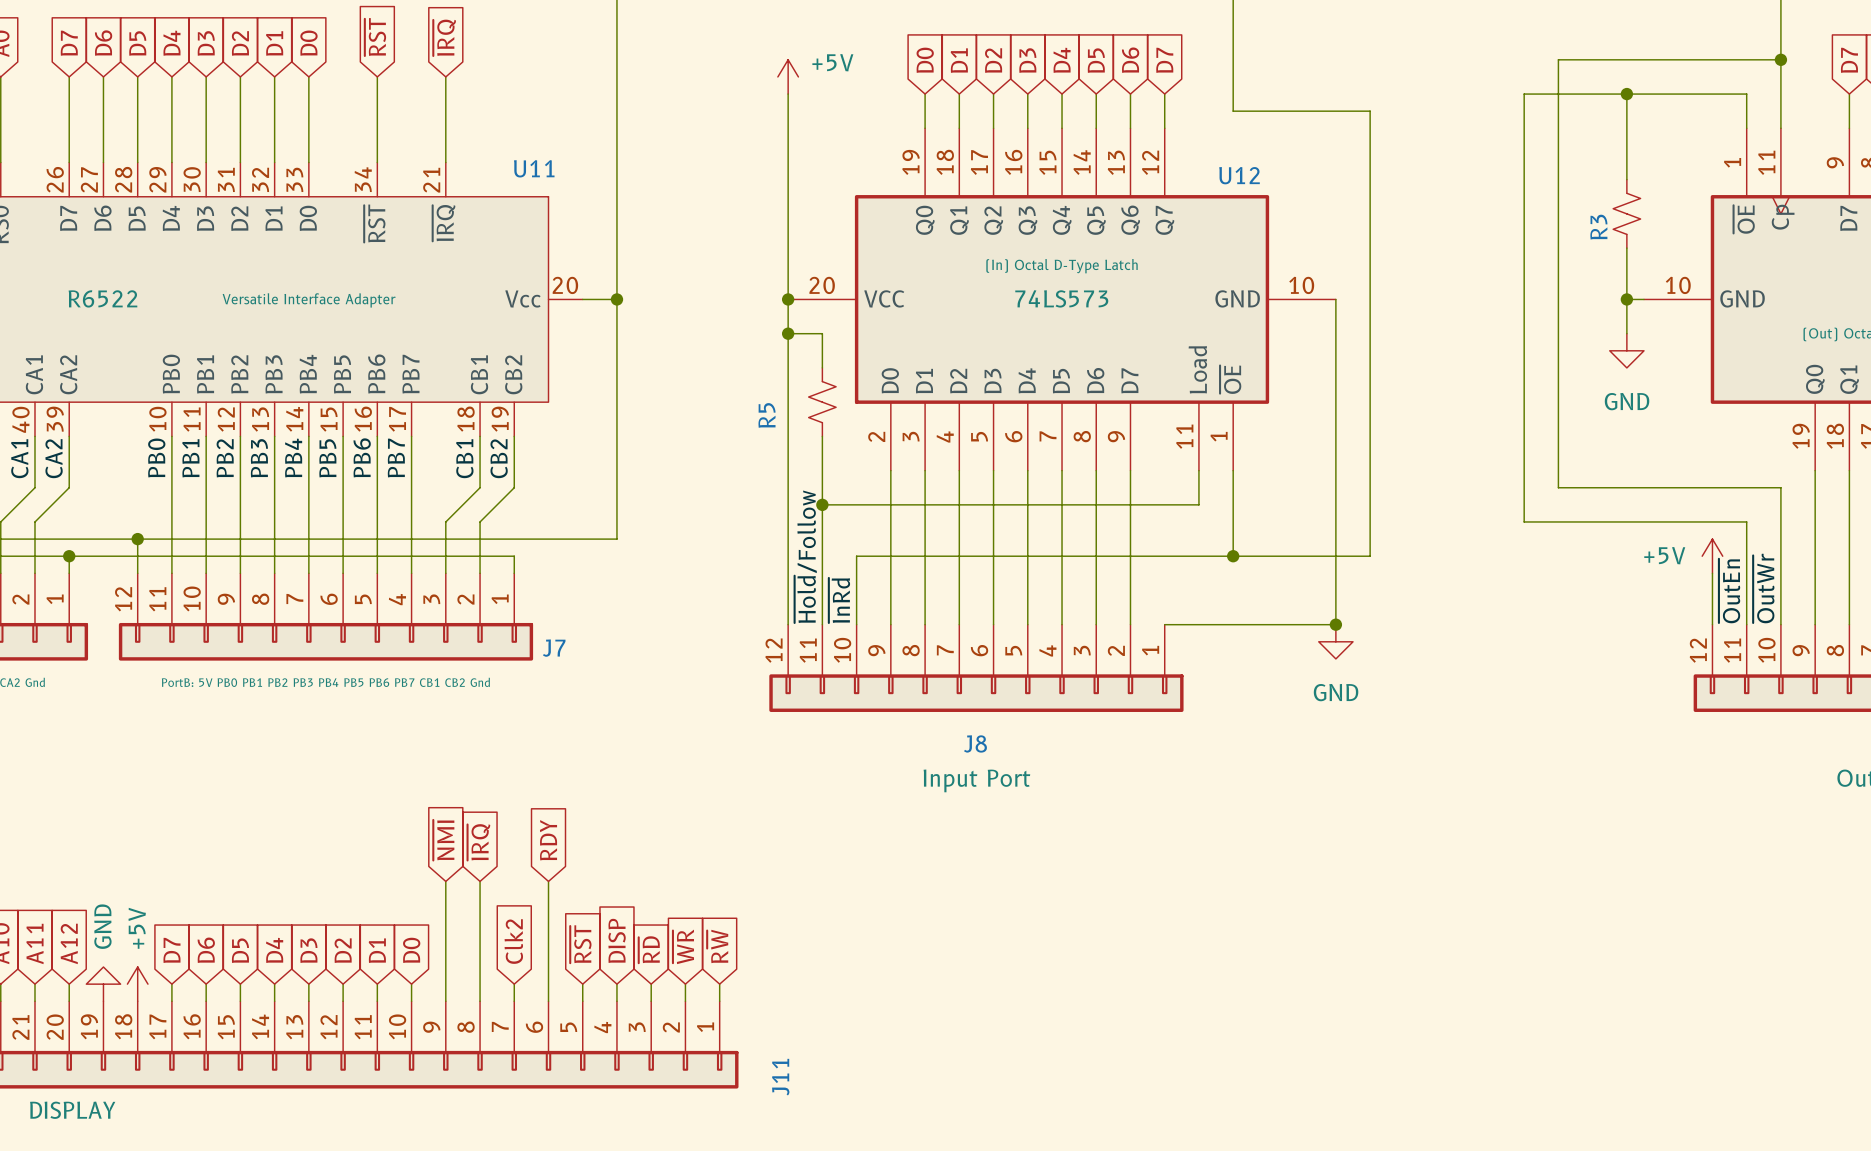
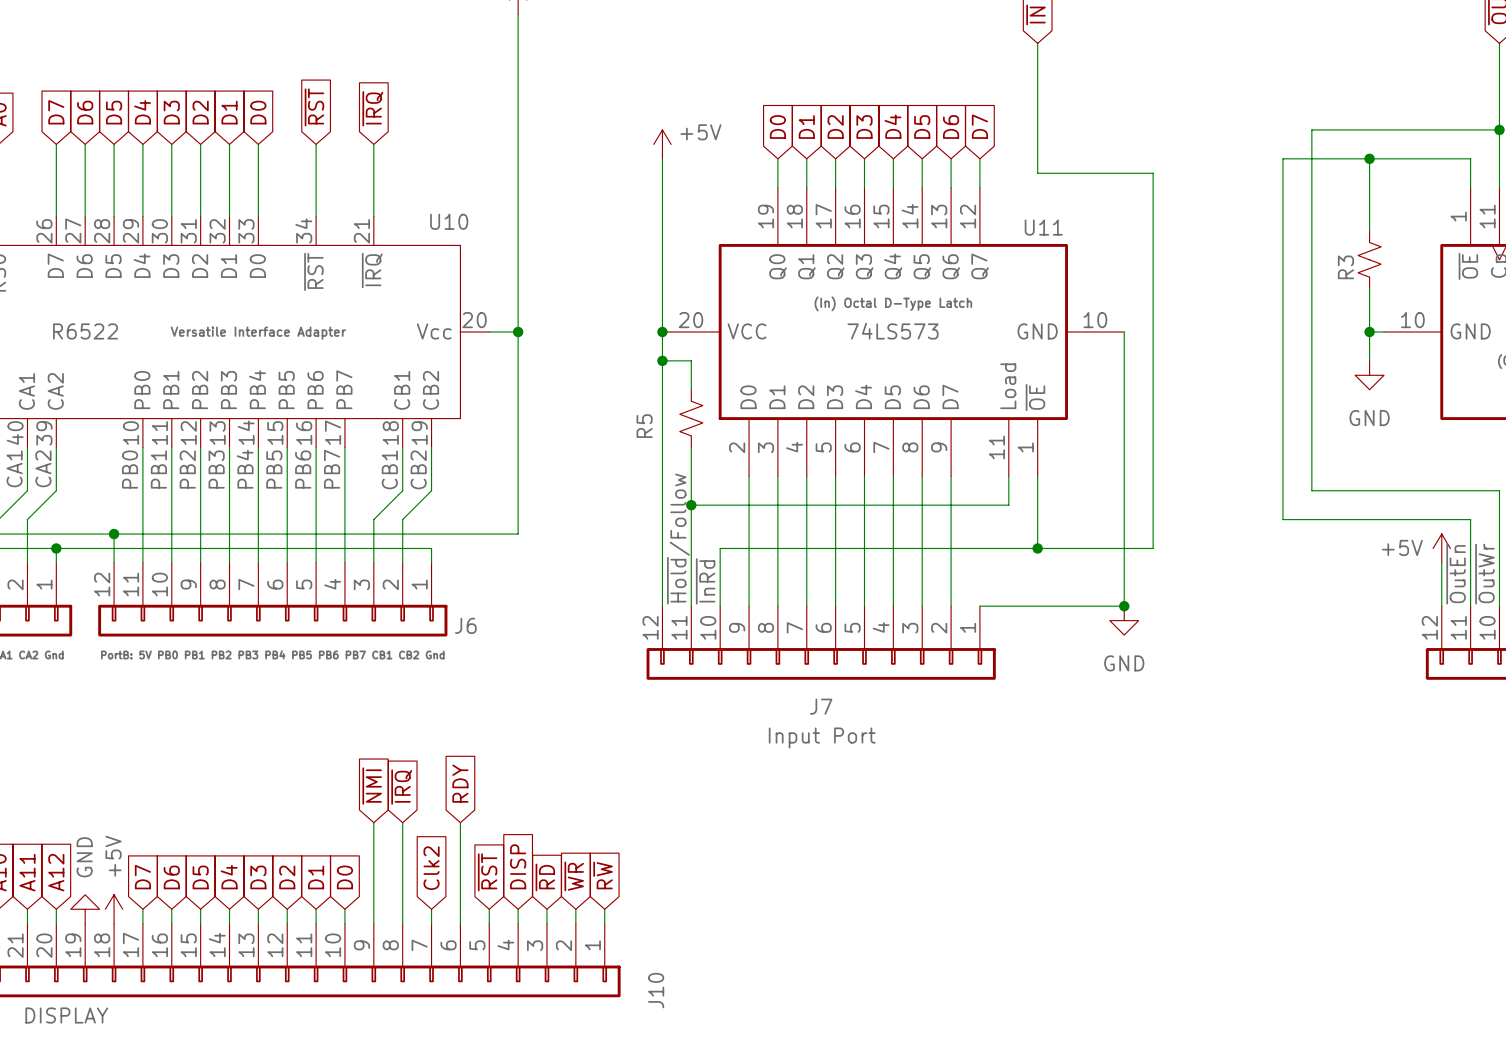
U11 name: U11 (534, 168) -> U10 (449, 221)
U12 name: U12 (1239, 175) -> U11 (1043, 227)
J7 name: J7 (554, 648) -> J6 (465, 625)
J8 name: J8 (975, 743) -> J7 (821, 706)
J11 name: J11 (780, 1077) -> J10 (656, 990)

